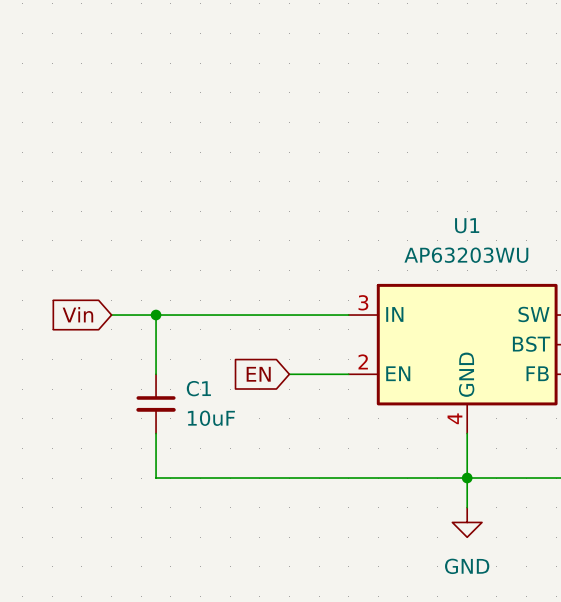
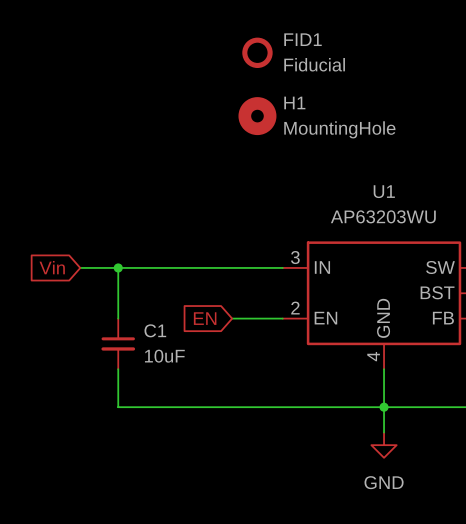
FID1: none -> Fiducial (257, 52)
H1: none -> MountingHole (257, 116)

